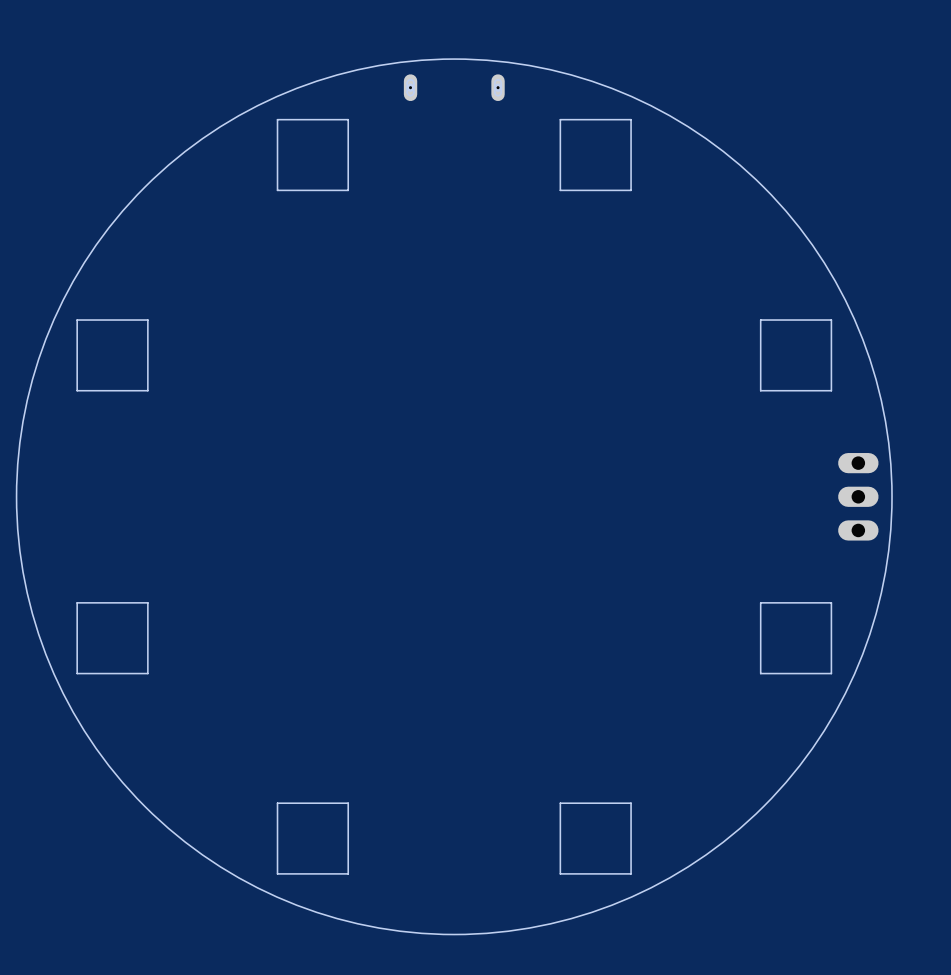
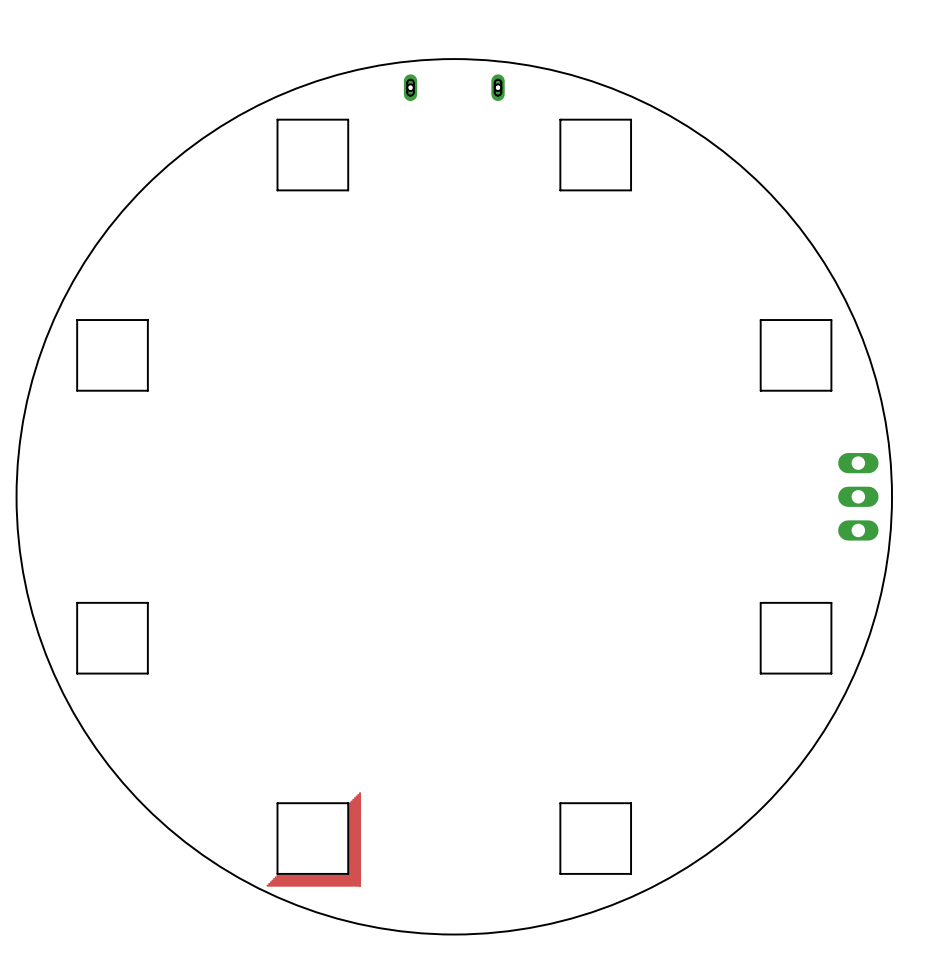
hole: (410, 87) -> none
hole: (498, 87) -> none
track: none -> (360, 793) (360, 885) (267, 885)
track: none -> (358, 794) (358, 884) (269, 884)
track: none -> (356, 796) (356, 882) (270, 882)
track: none -> (354, 798) (354, 880) (272, 880)
track: none -> (353, 799) (353, 878) (274, 878)
track: none -> (351, 801) (351, 877) (275, 877)
track: none -> (349, 803) (349, 875) (277, 875)

